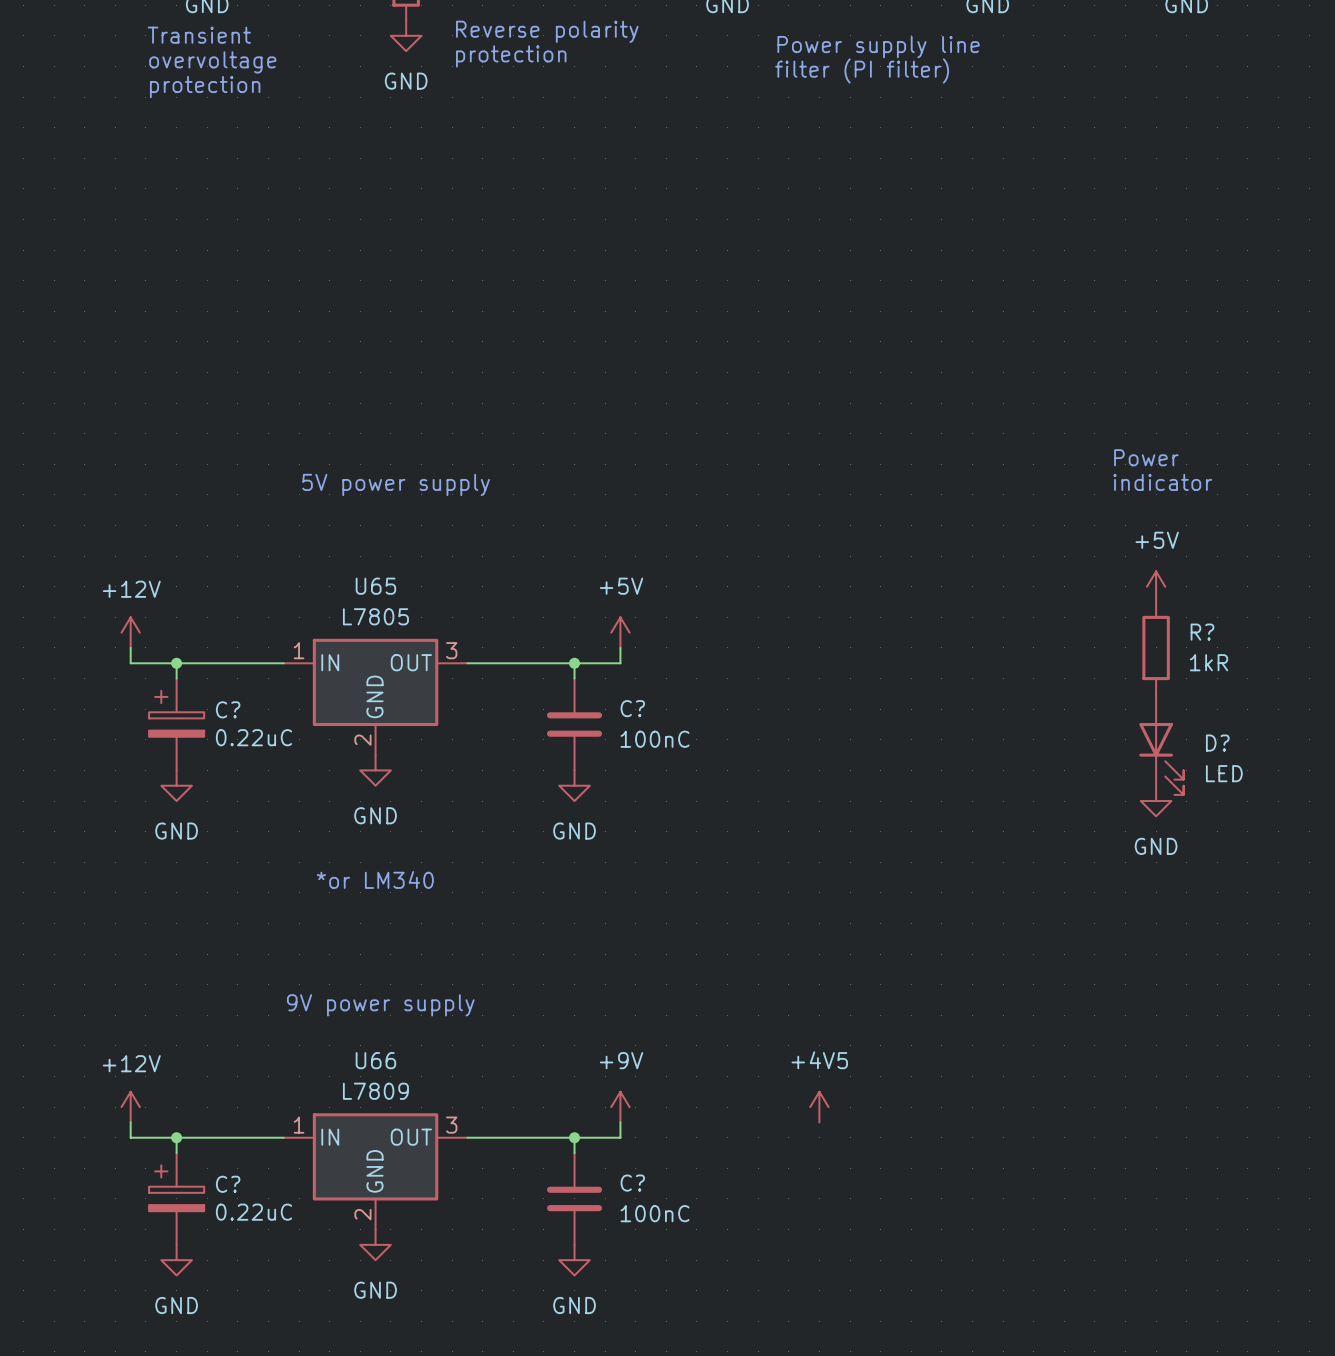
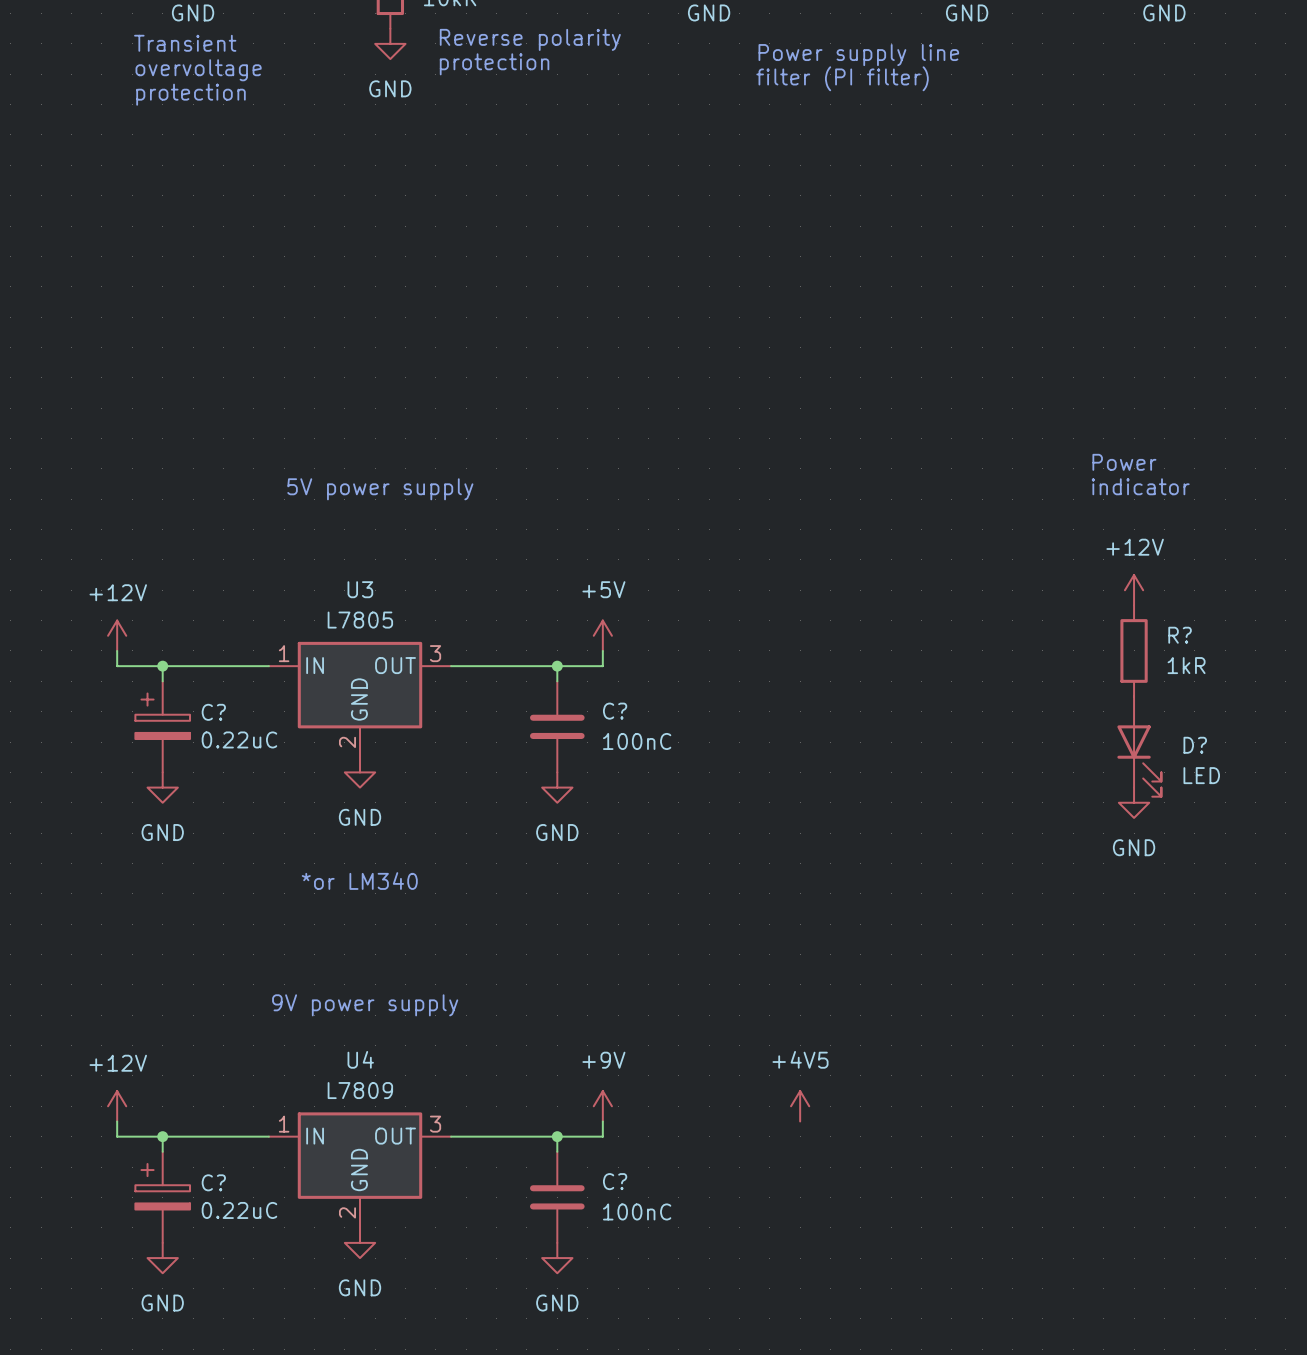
U65 name: U65 (375, 586) -> U3 (360, 589)
power symbol: +5V (1156, 586) -> +12V (1134, 590)
U66 name: U66 (375, 1060) -> U4 (360, 1059)

